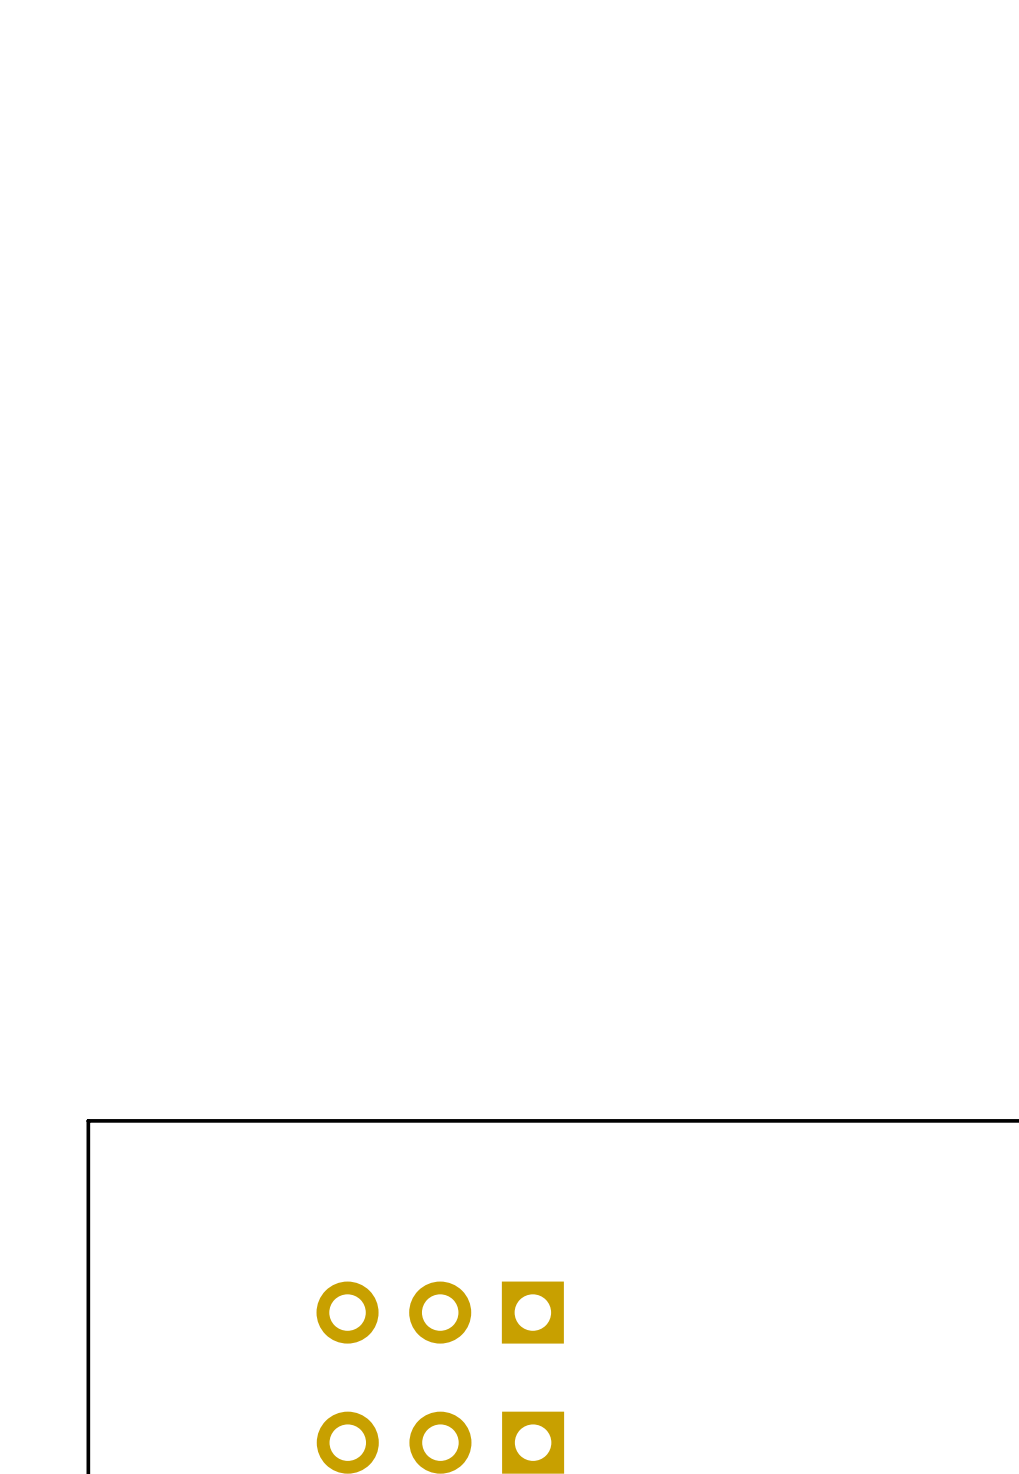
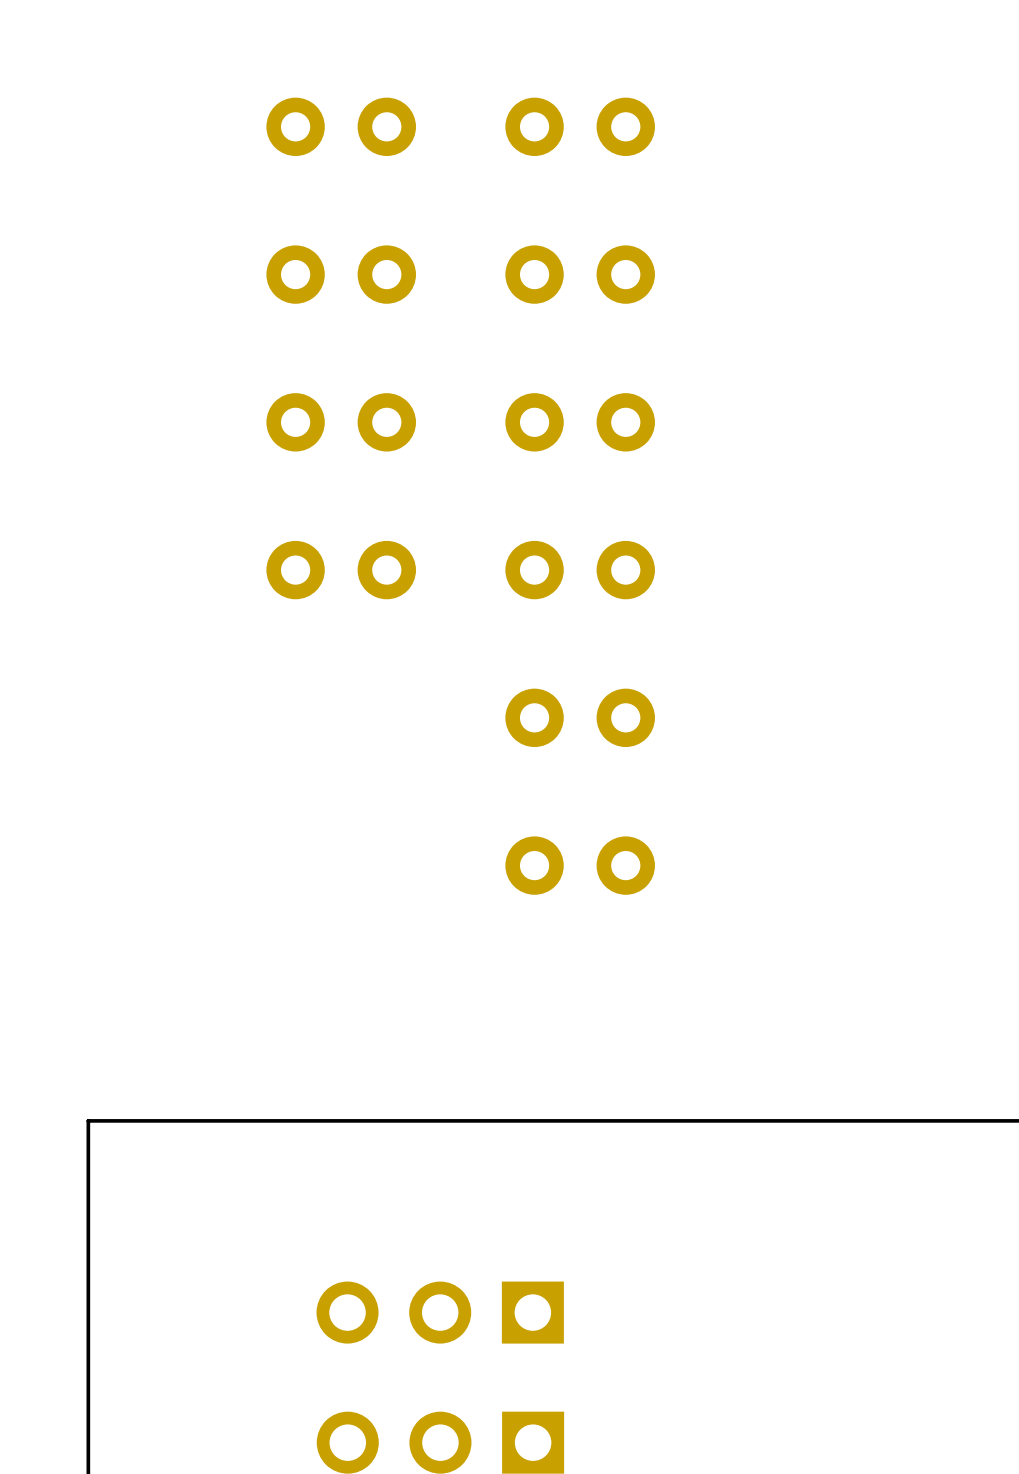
part: none -> (341, 126)
part: none -> (580, 126)
part: none -> (341, 274)
part: none -> (580, 274)
part: none -> (341, 422)
part: none -> (580, 422)
part: none -> (341, 570)
part: none -> (580, 570)
part: none -> (580, 717)
part: none -> (580, 865)

